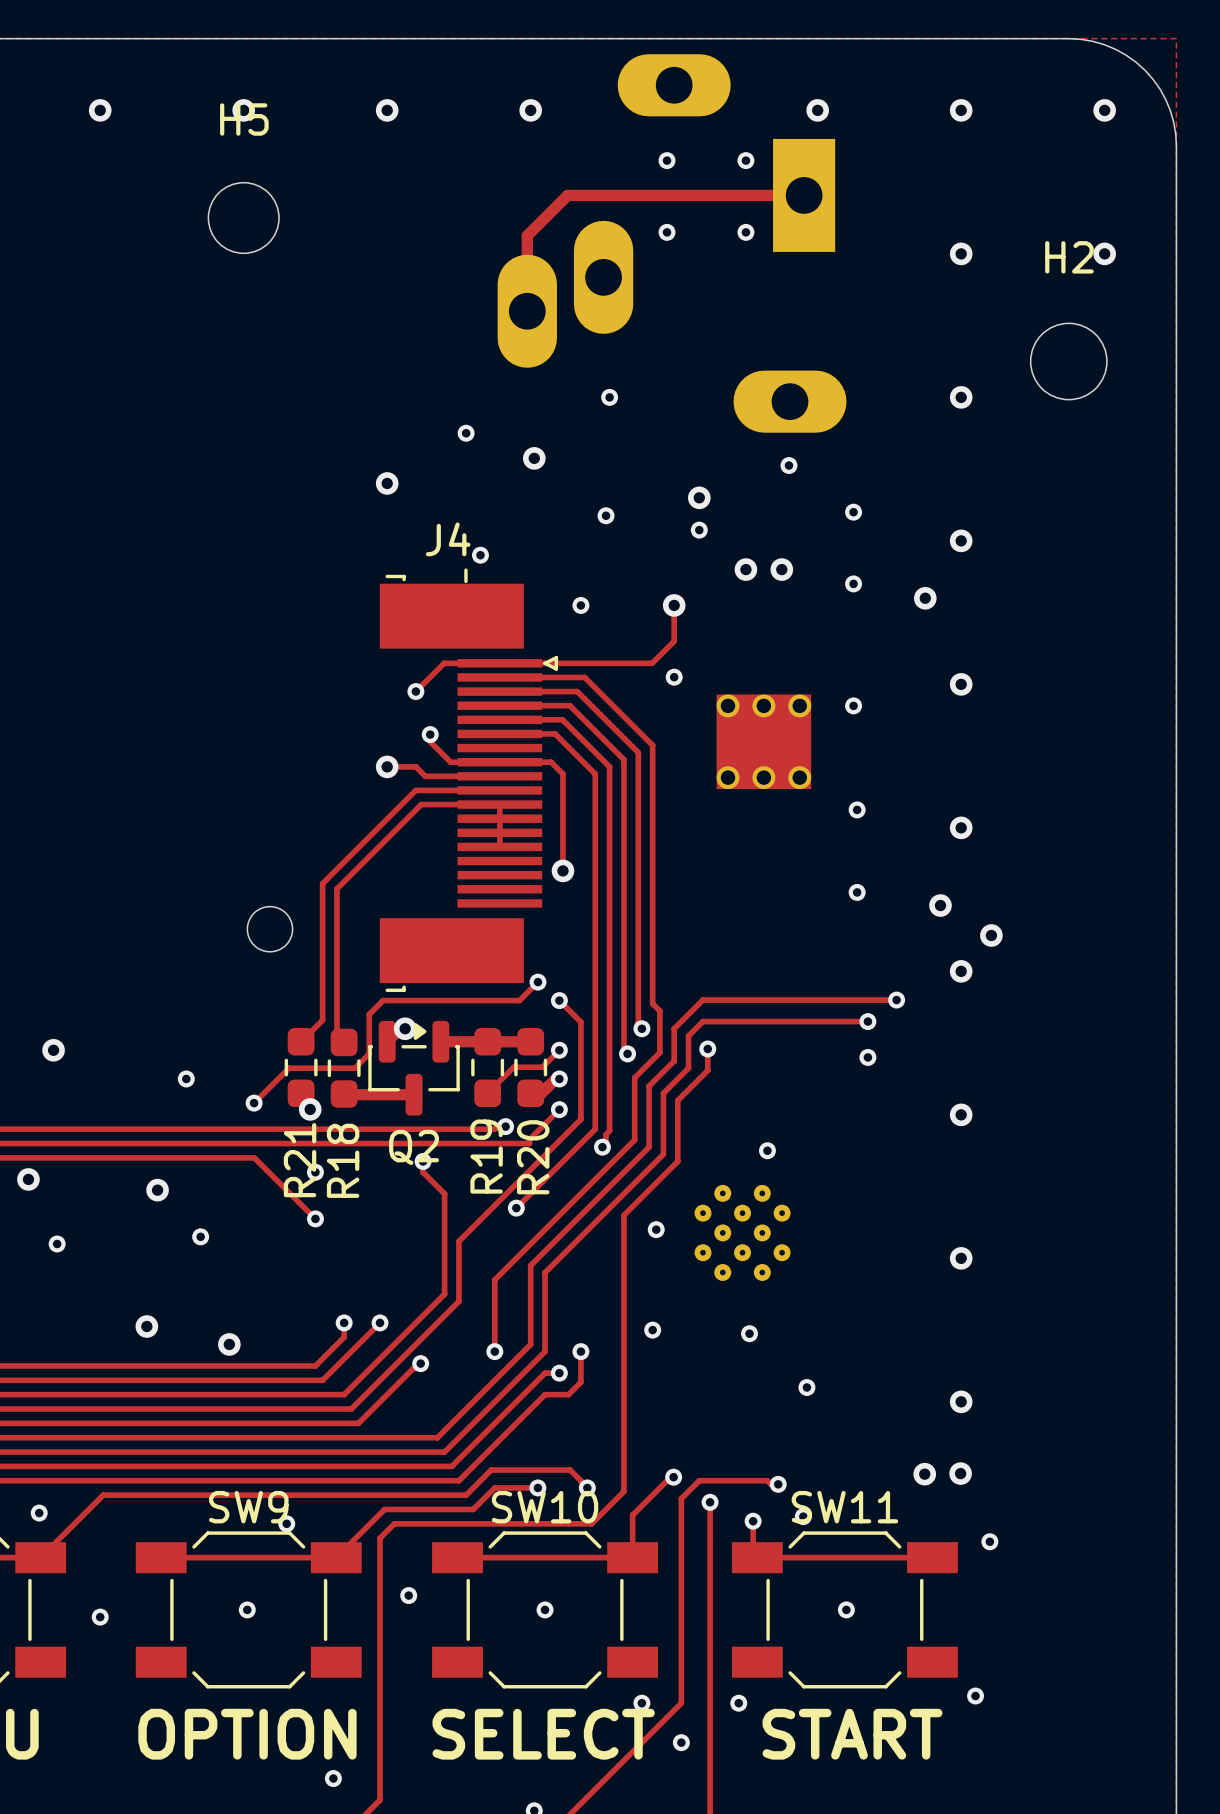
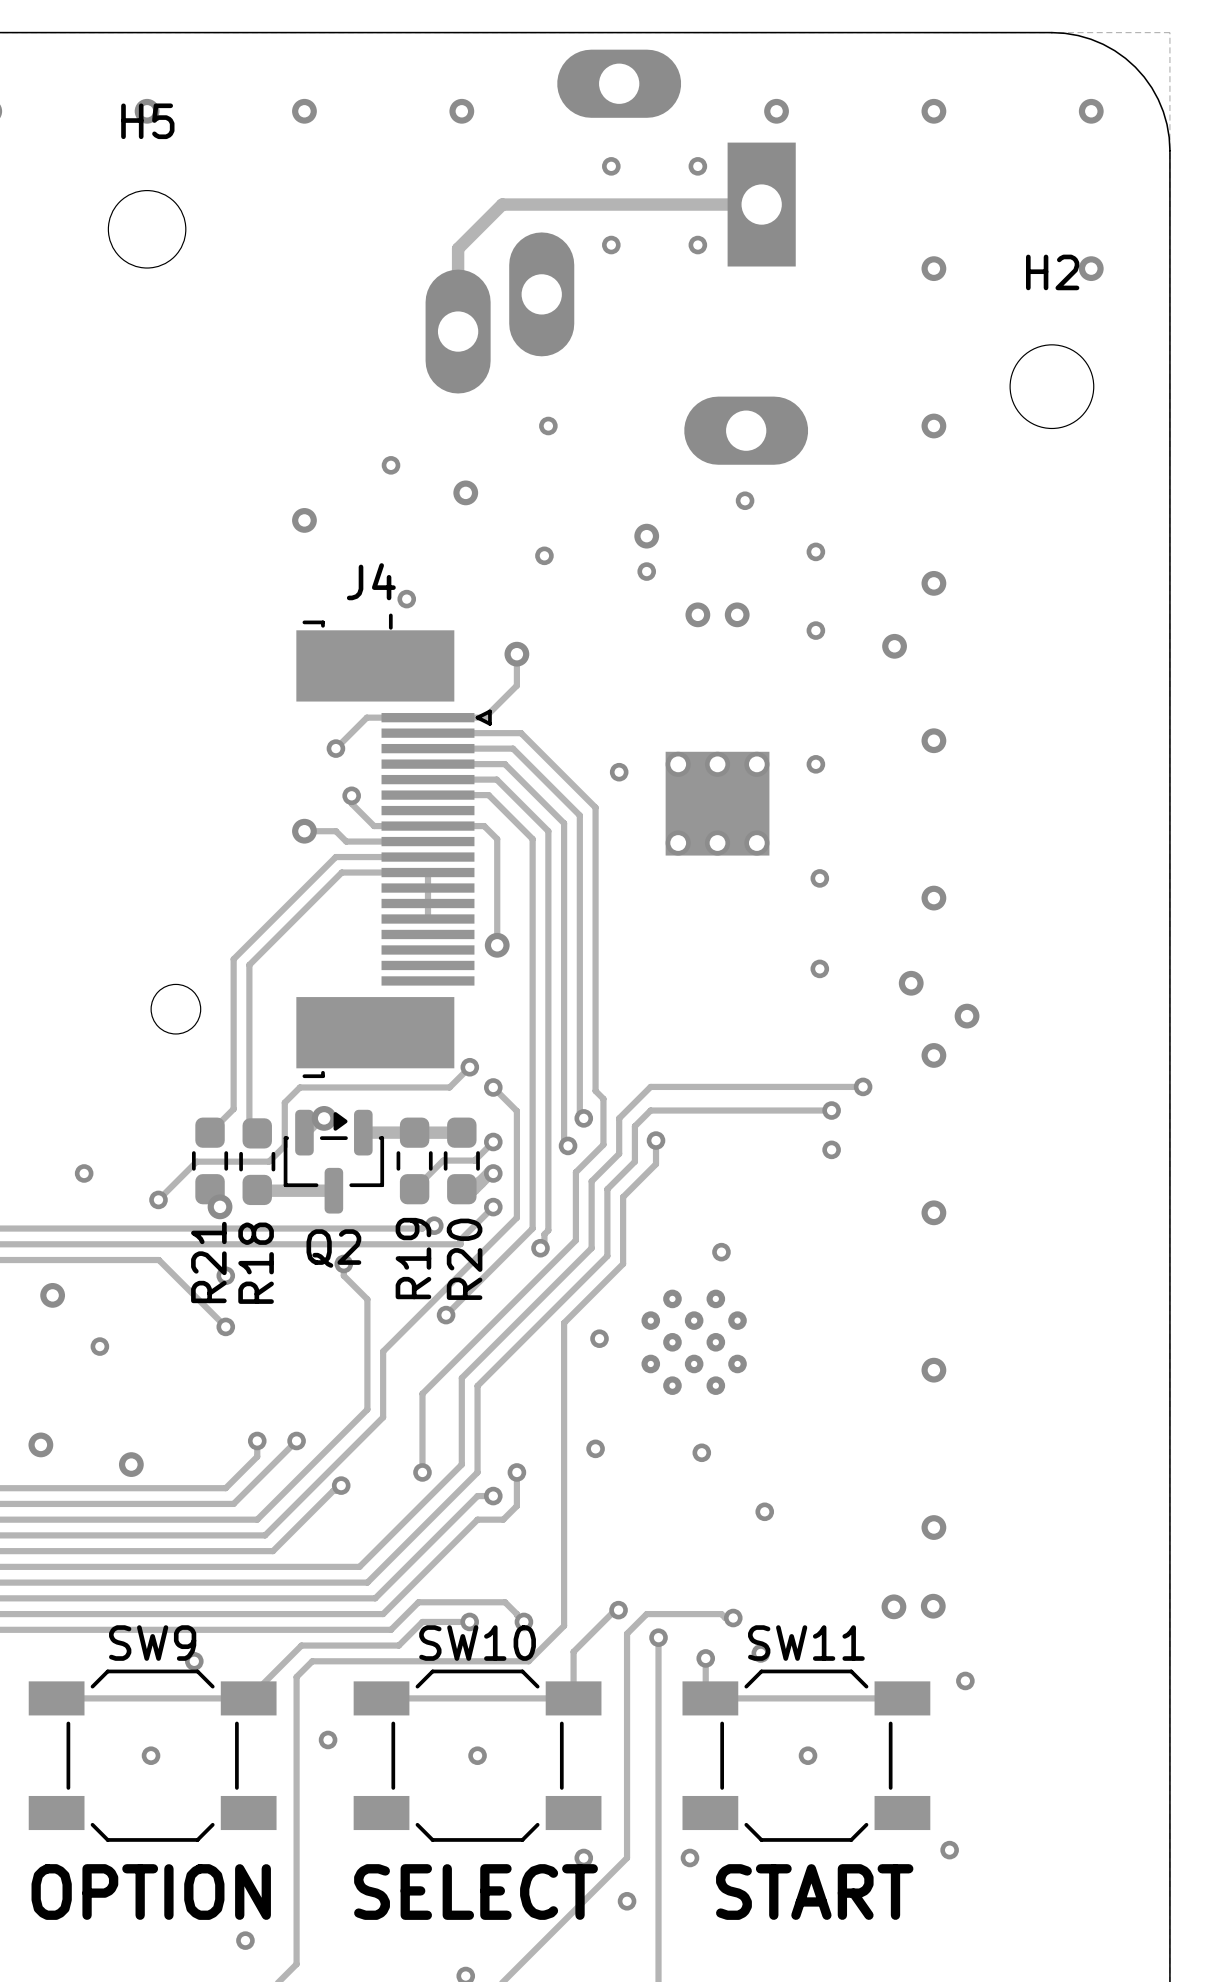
via: (580, 605) -> none
track: (674, 605) (674, 641) (652, 663) (551, 663) -> (516, 654) (516, 685) (484, 717)
via position: (674, 605) -> (516, 654)
via position: (674, 677) -> (619, 772)

